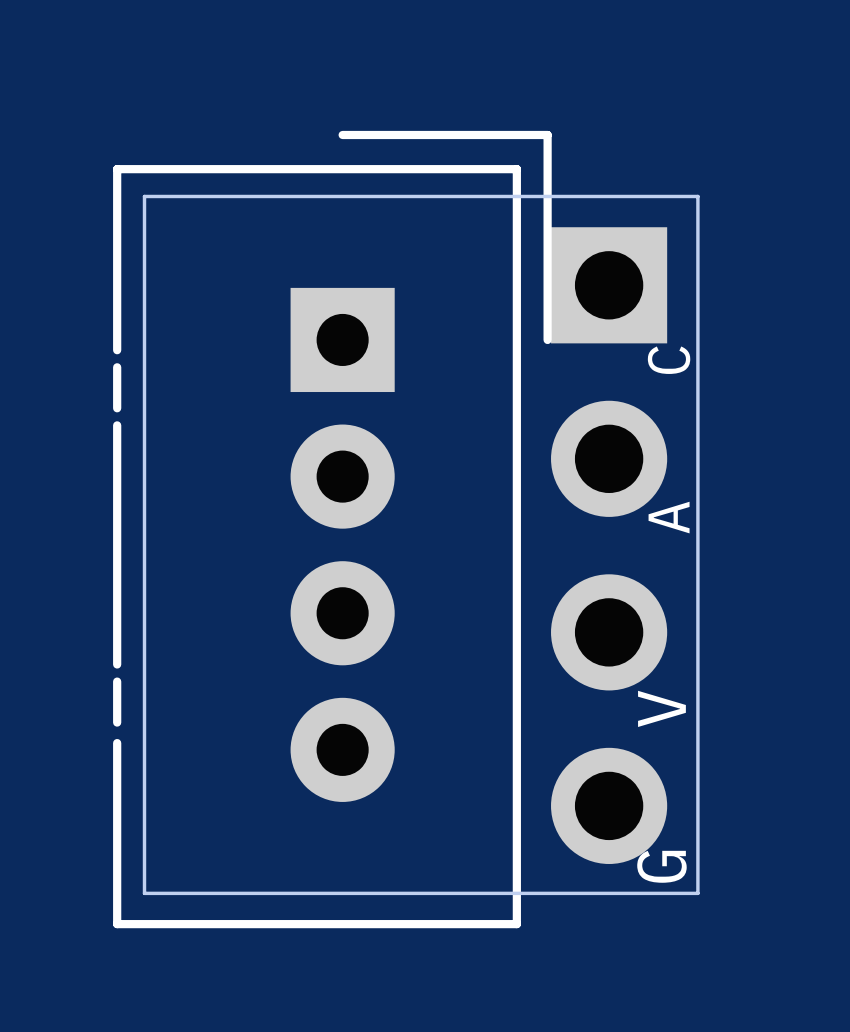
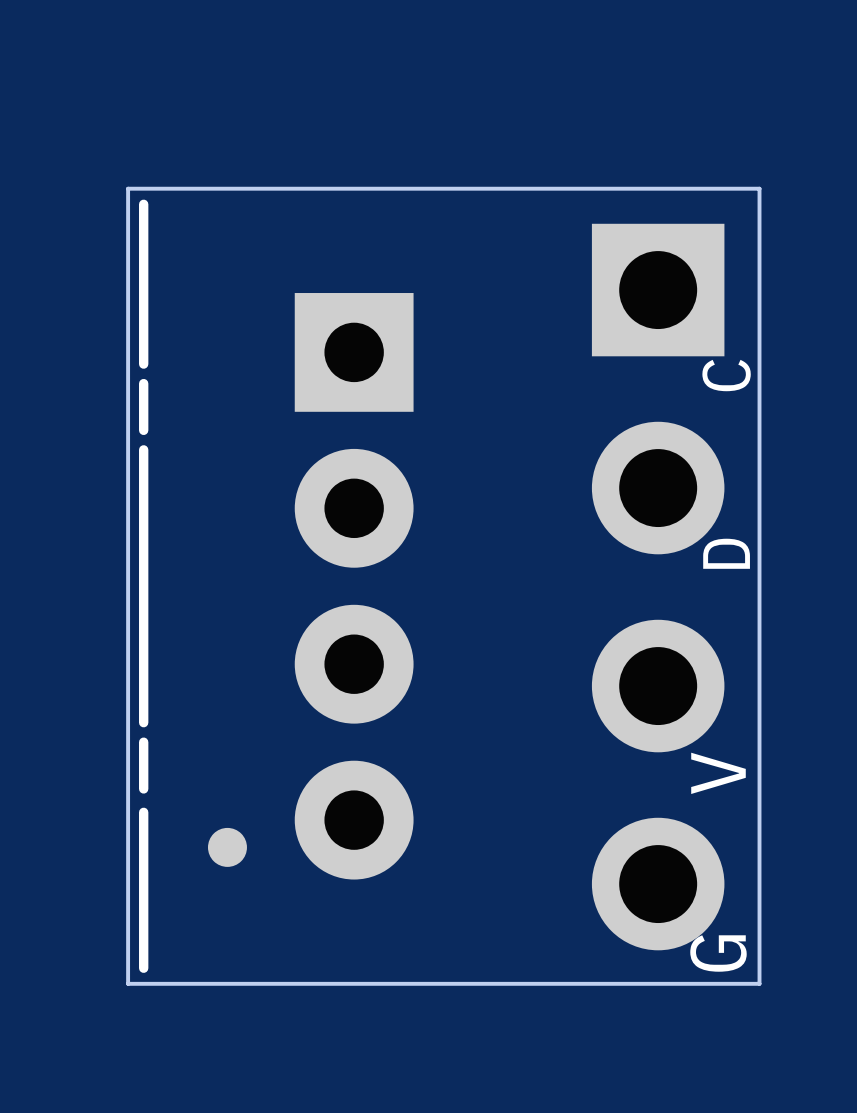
part footprint: [113, 130, 552, 929] -> [139, 199, 414, 973]
text: A (669, 517) -> D (726, 553)
part: none -> (227, 847)

